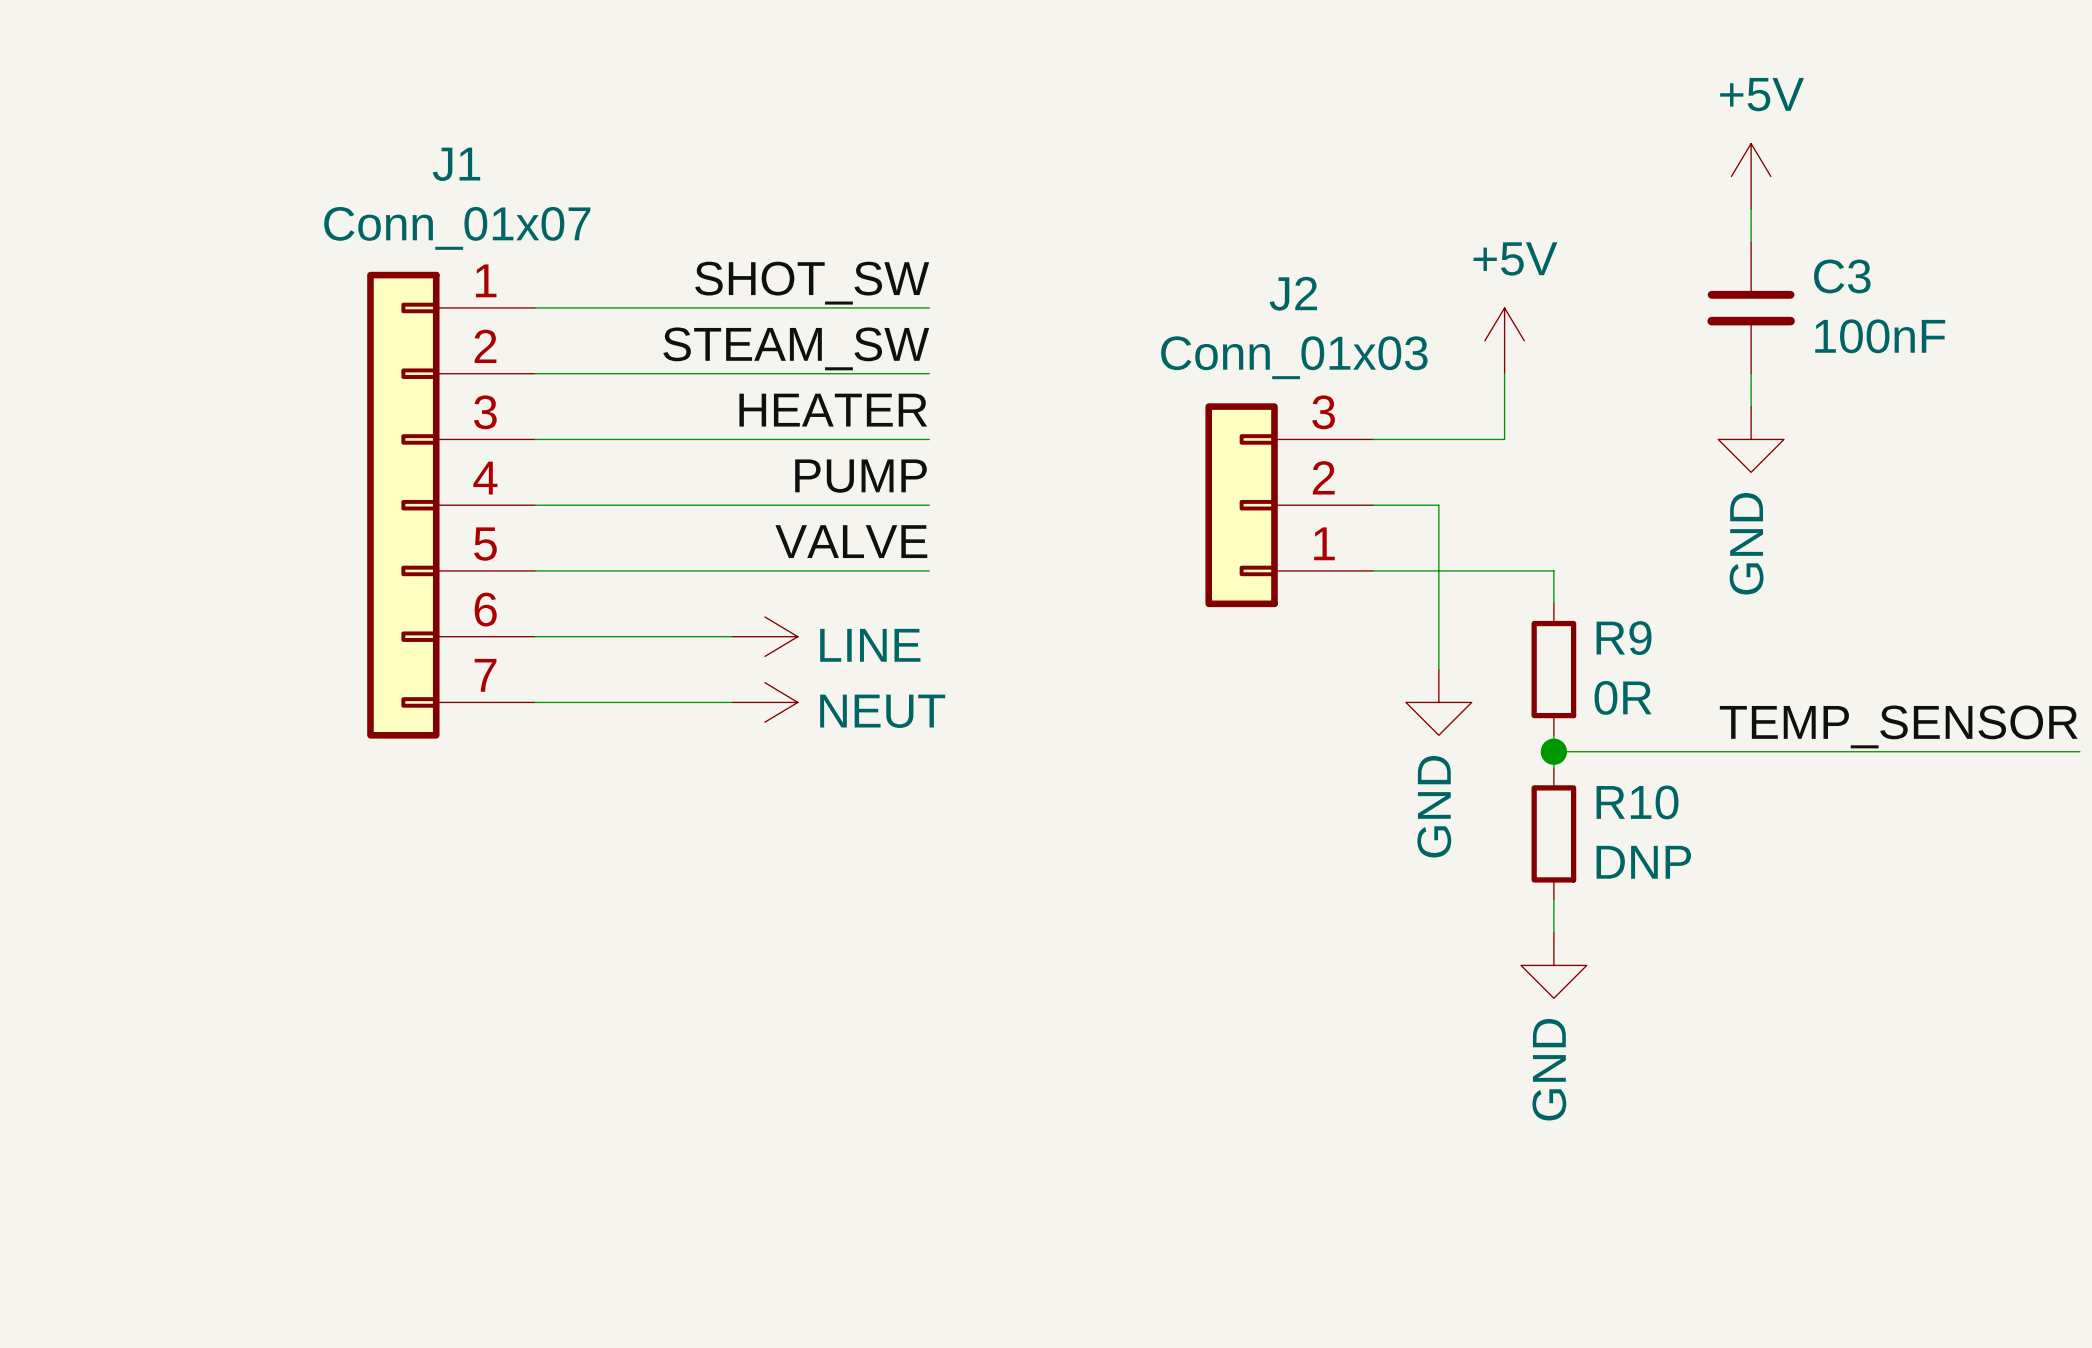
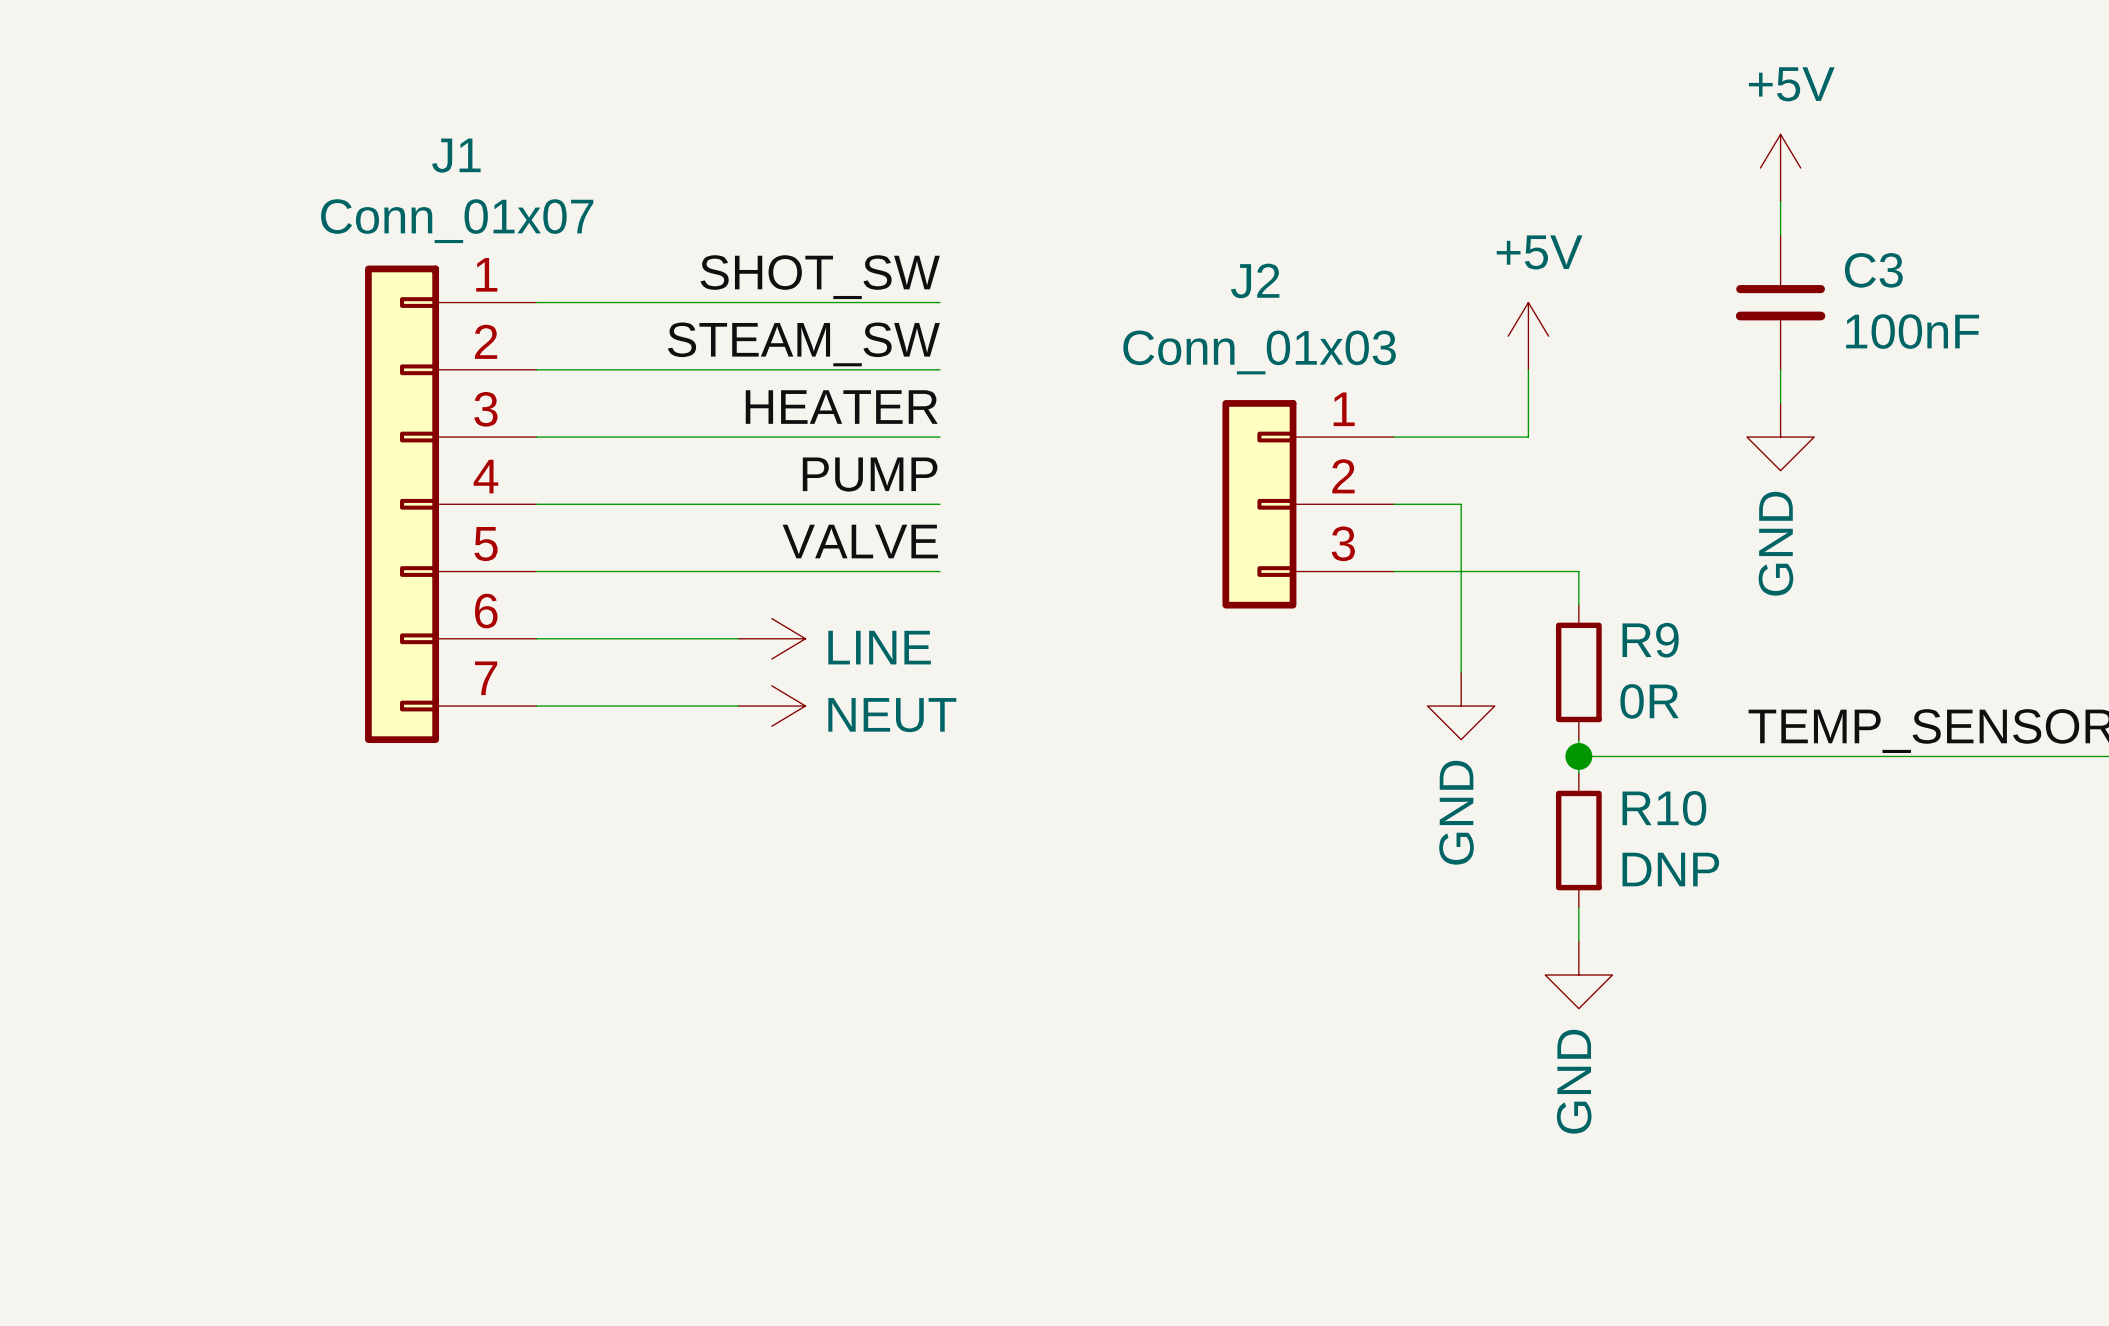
J2 name position: J2 (1293, 293) -> J2 (1255, 280)
J2 value position: Conn_01x03 (1294, 357) -> Conn_01x03 (1259, 352)
J2 flip: as is (1241, 505) -> up-down (1259, 504)

